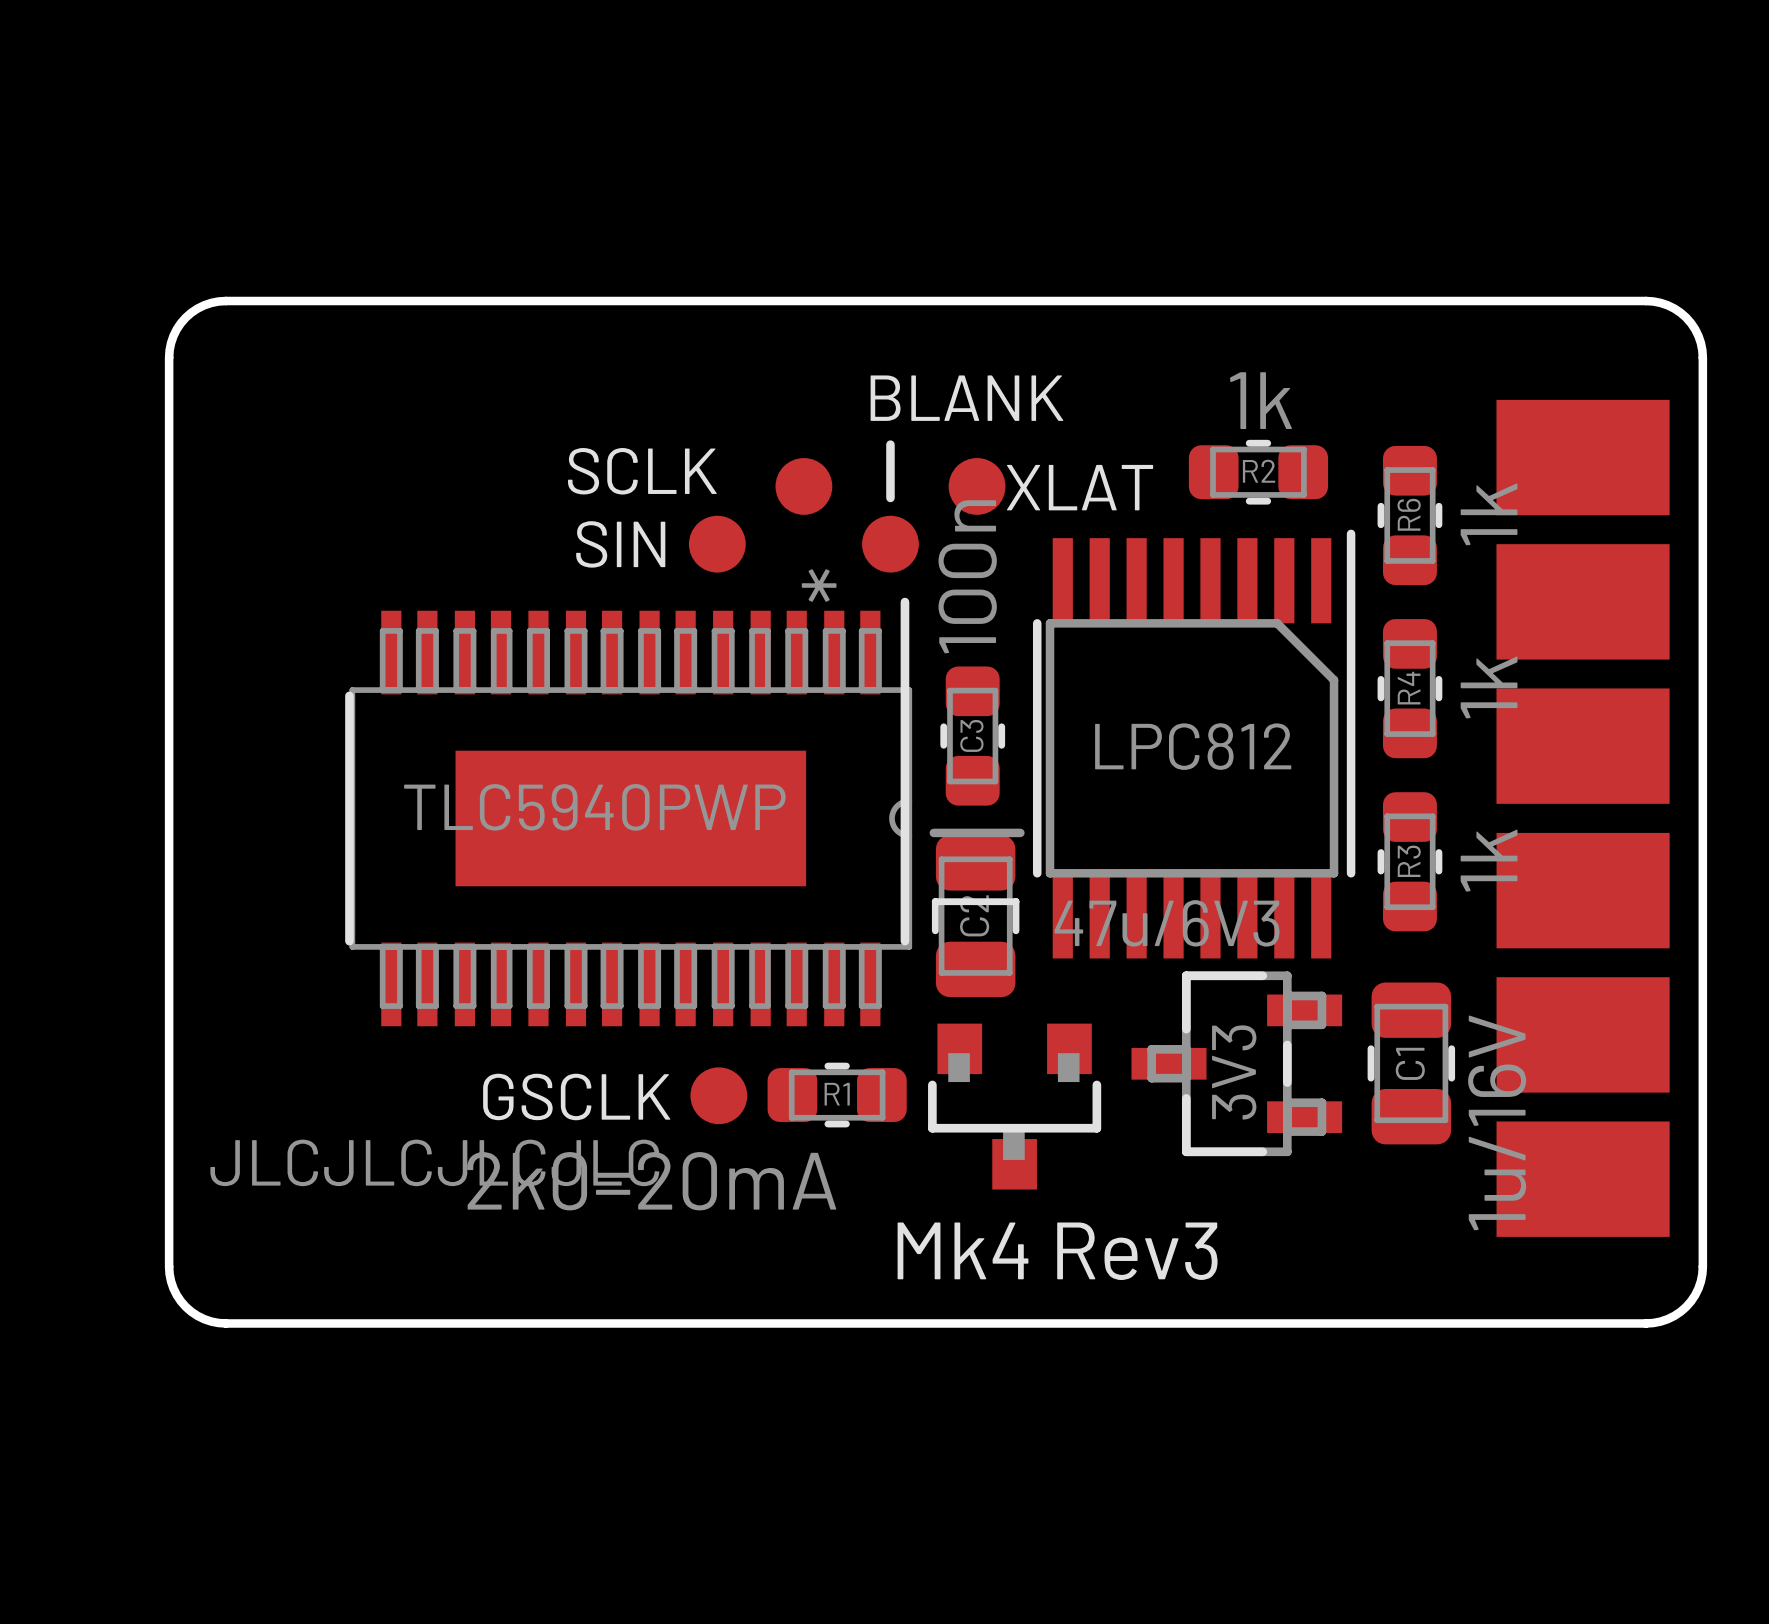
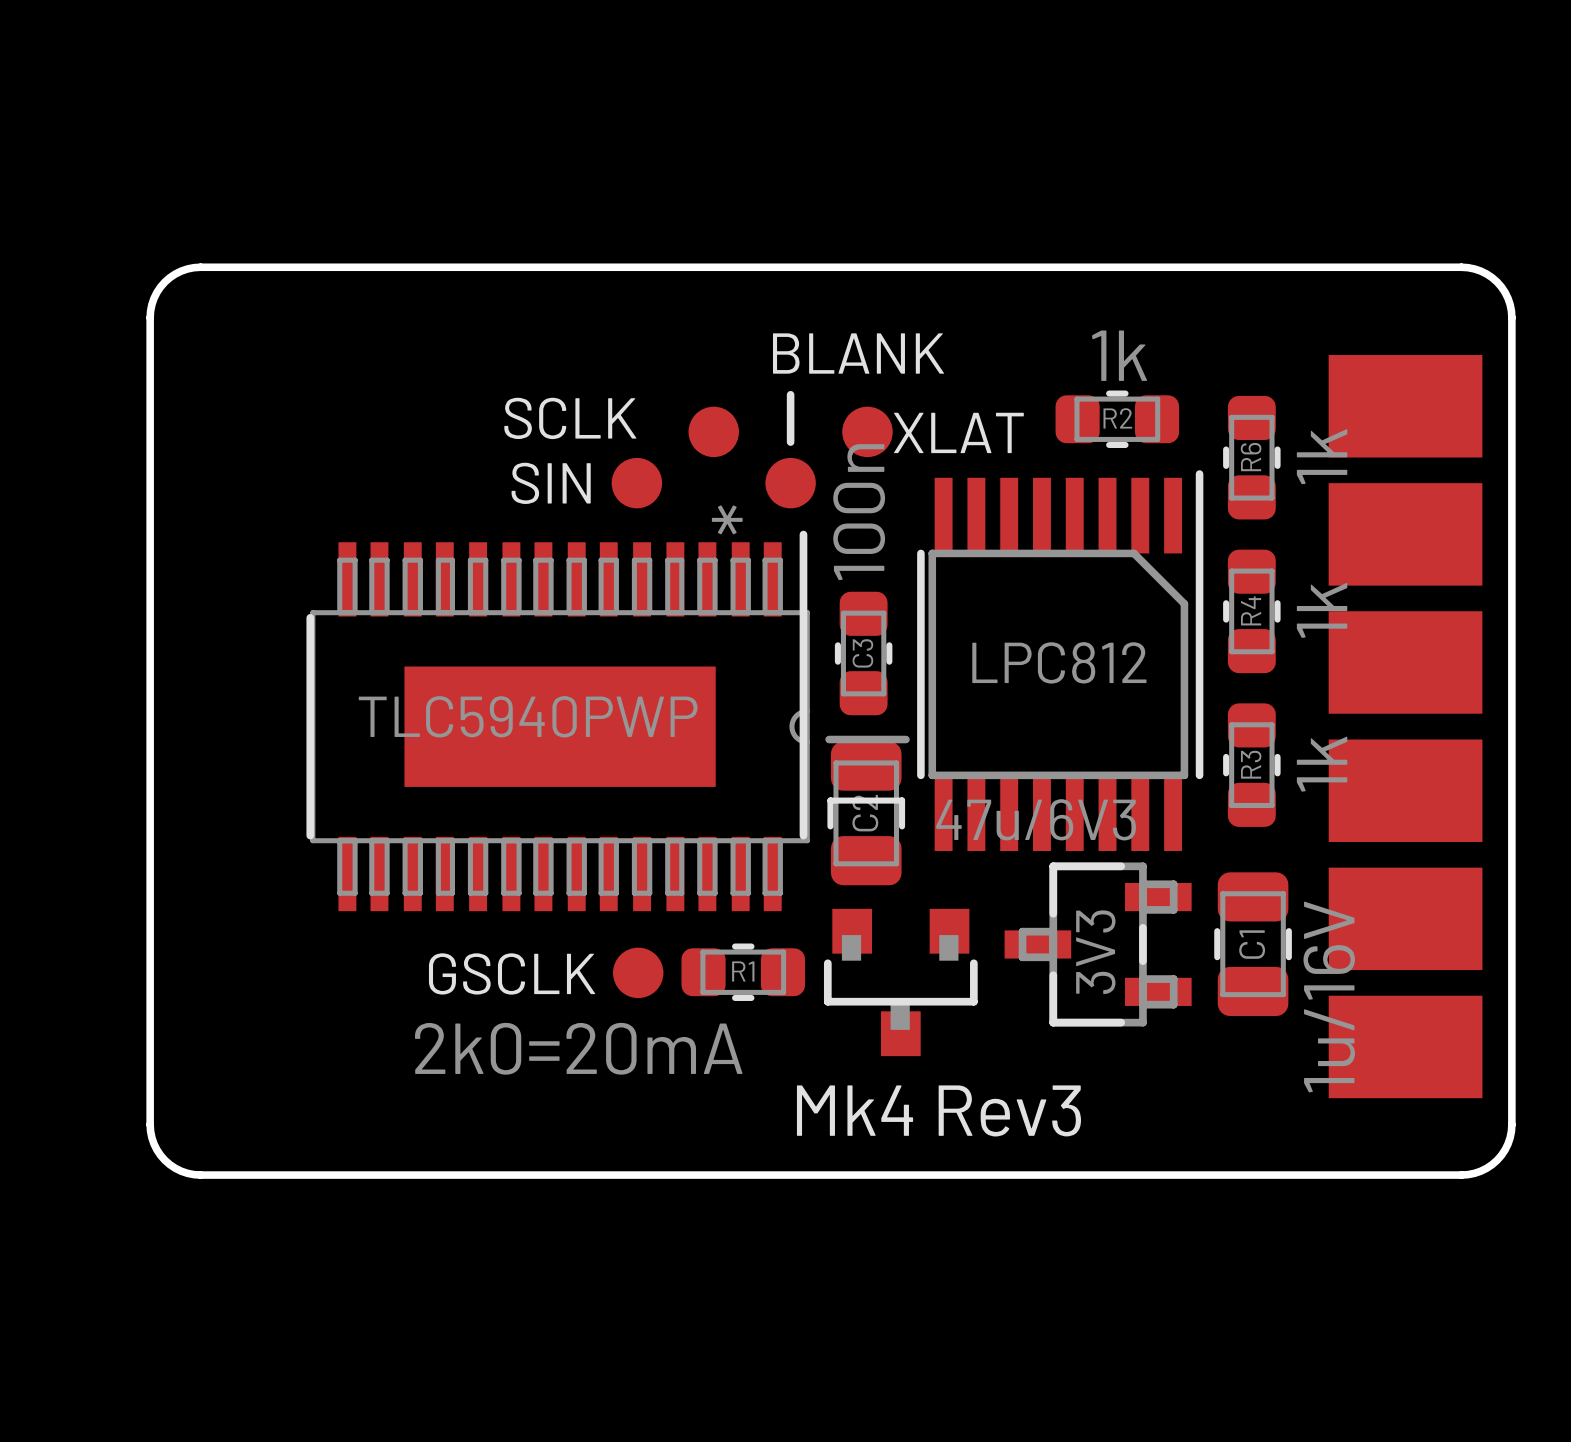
text: JLCJLCJLCJLC (434, 1162) -> none

